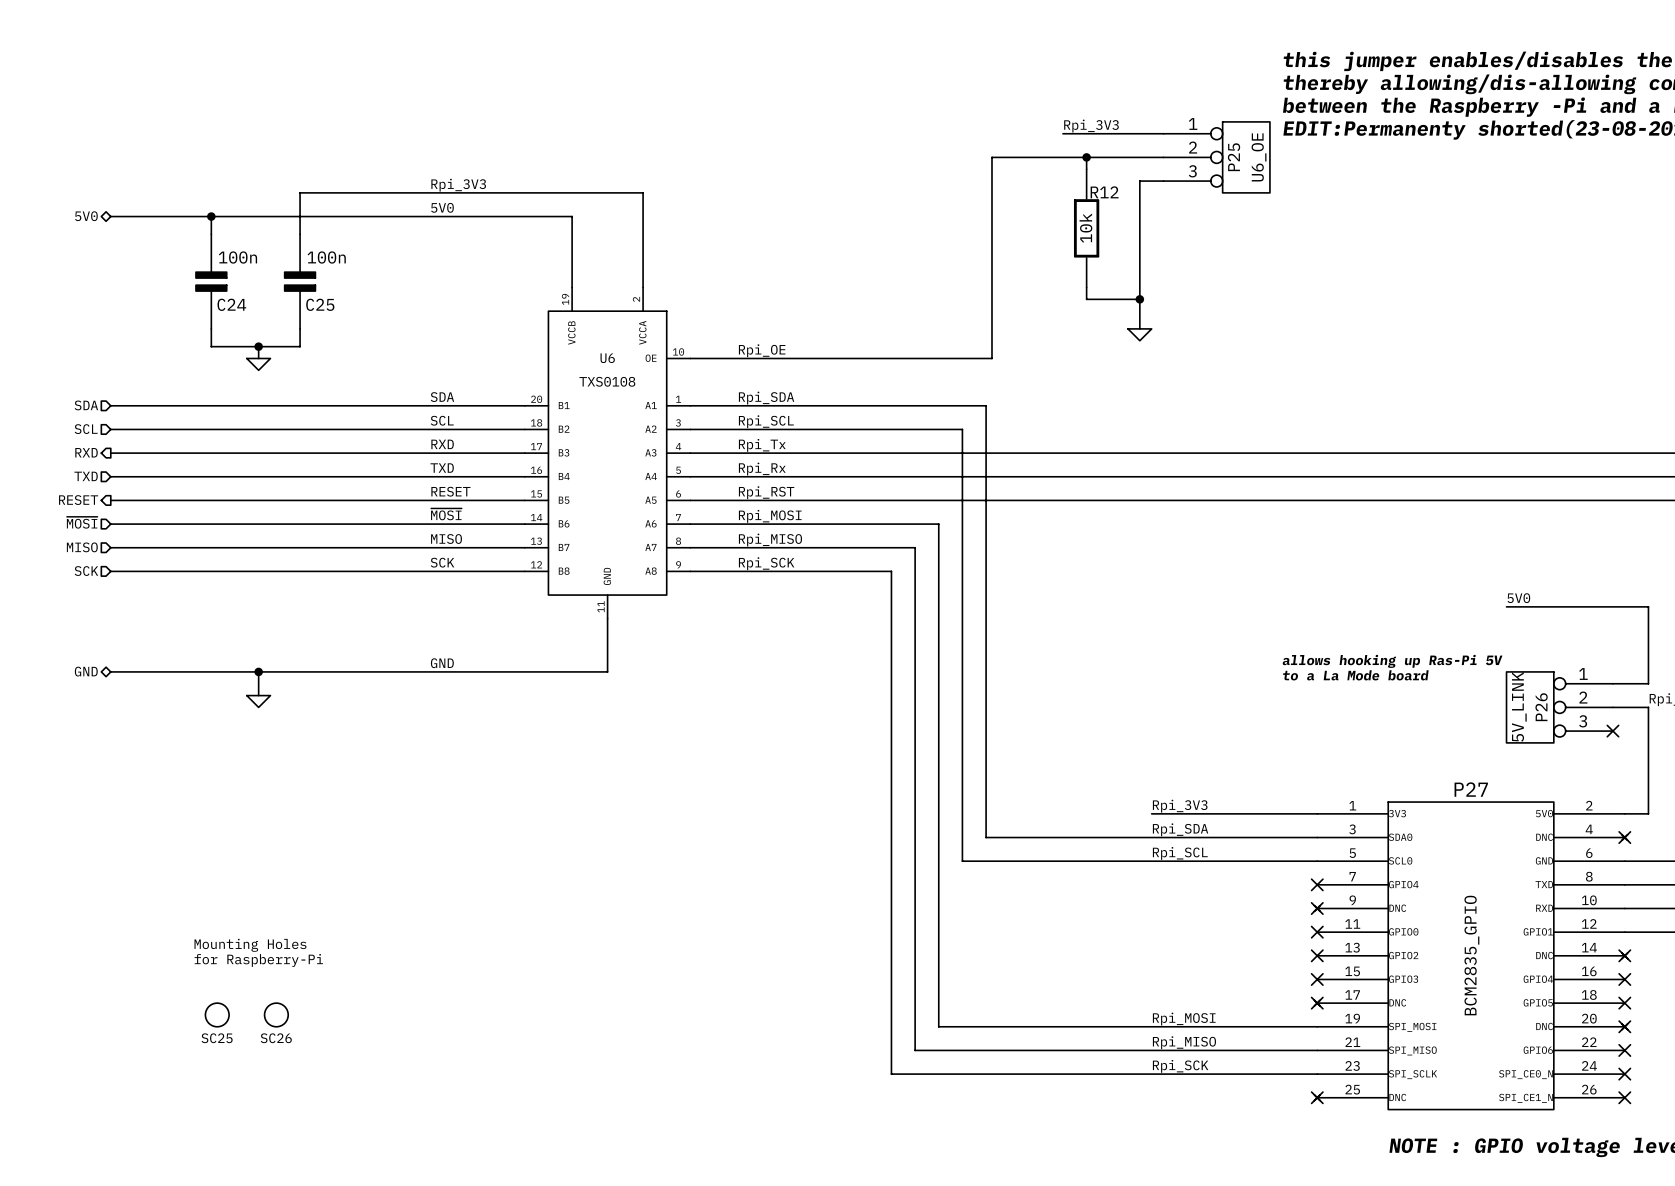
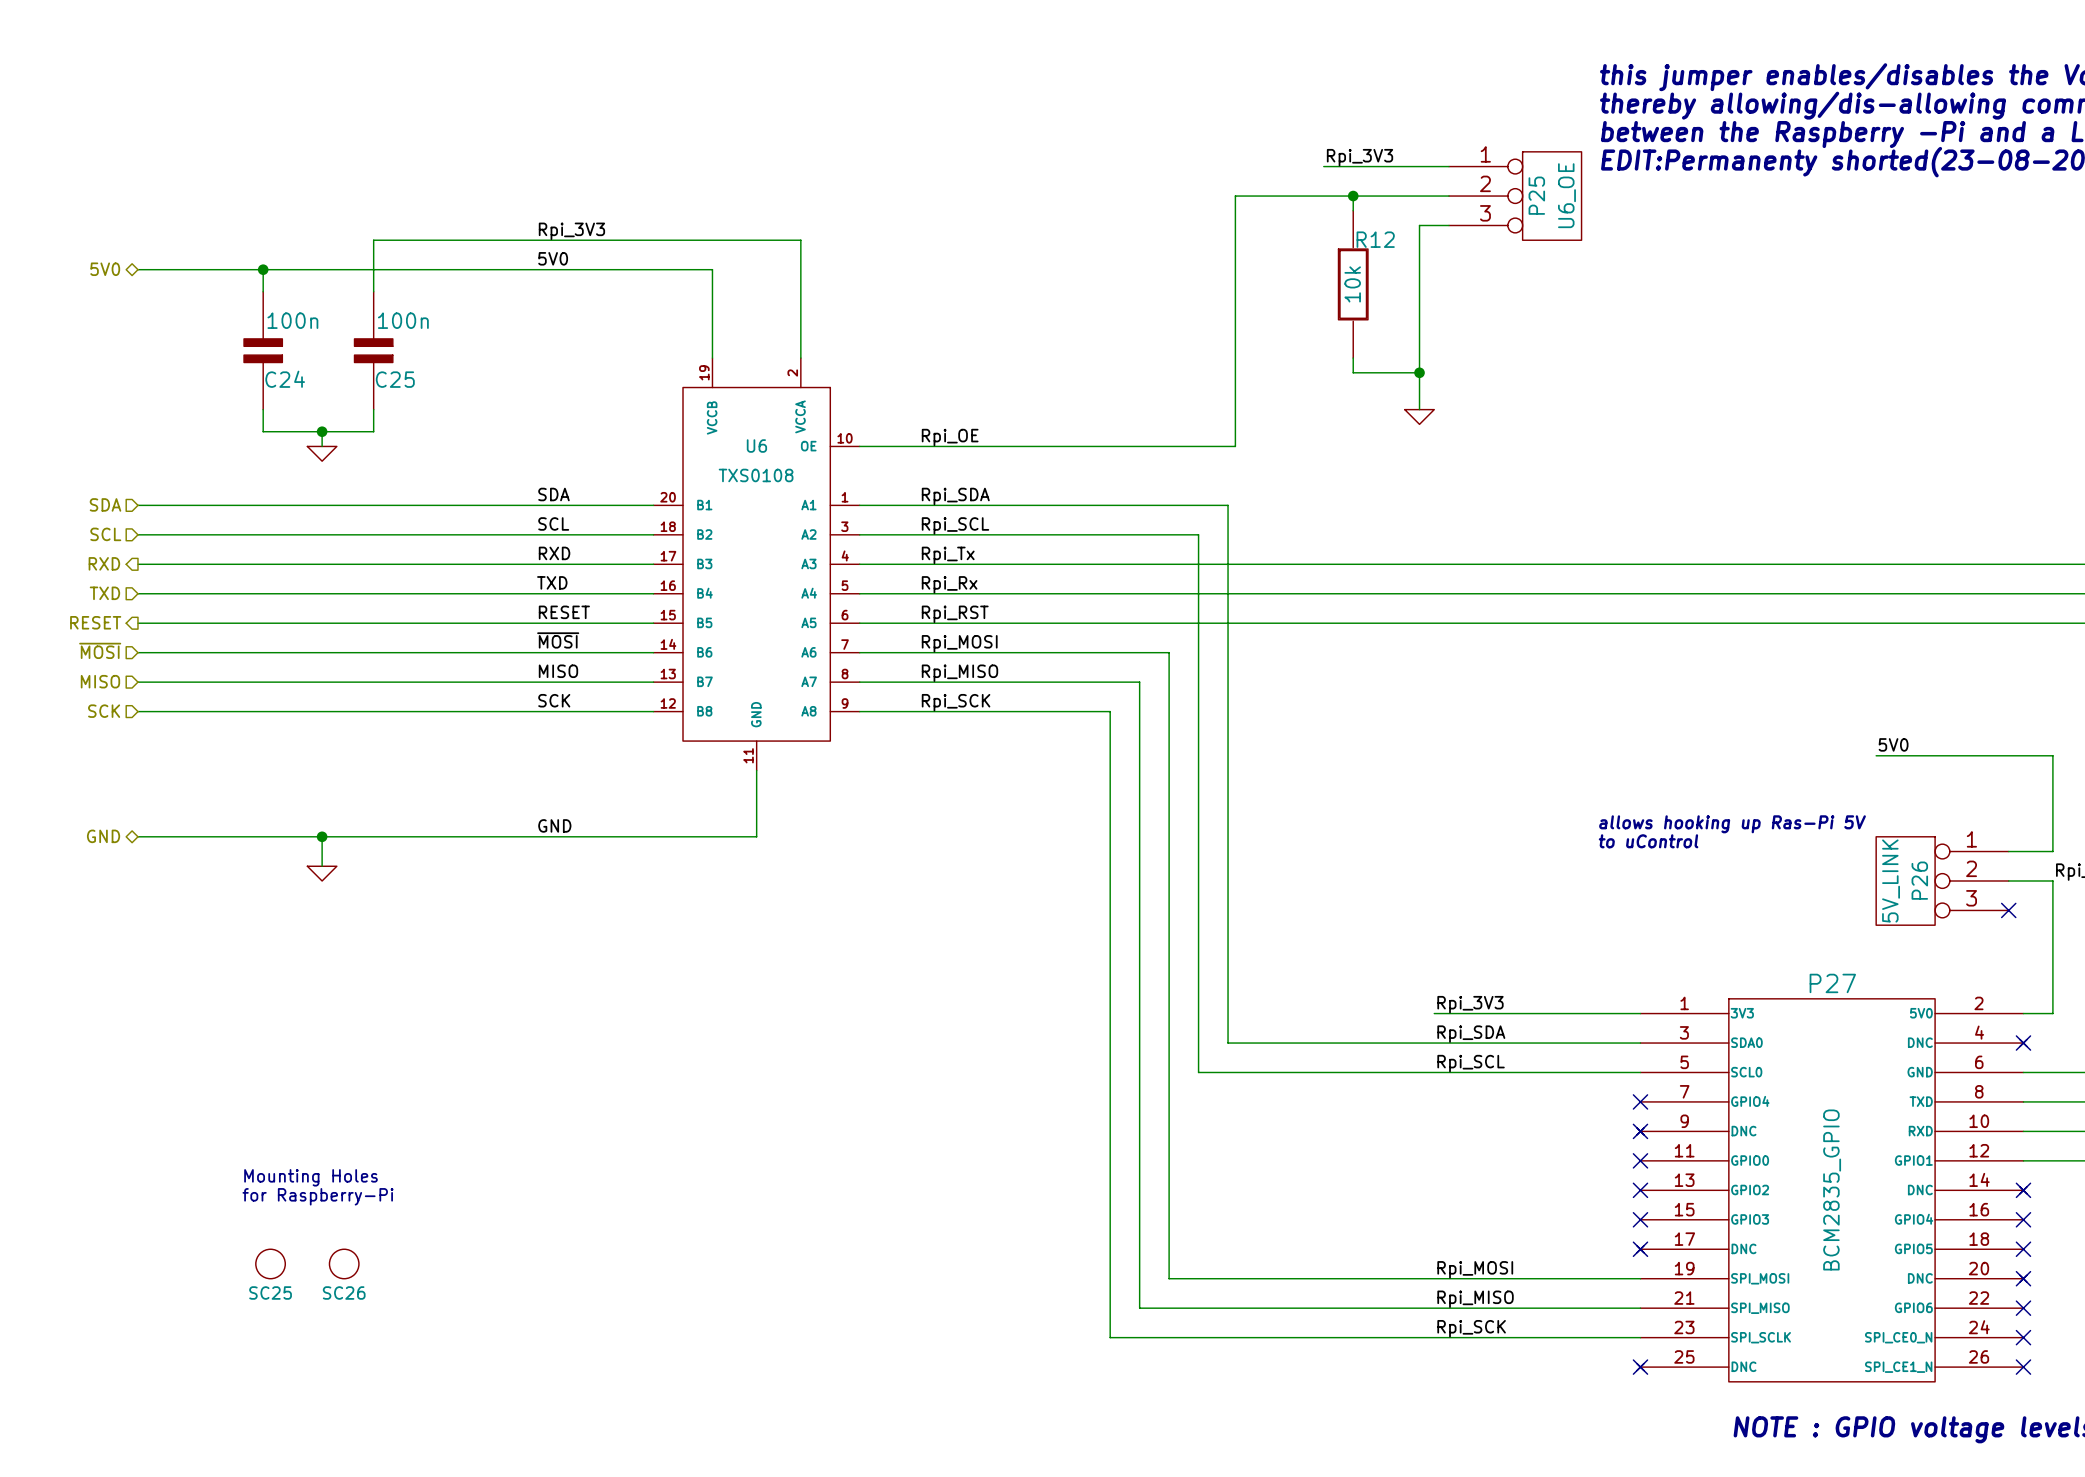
text: to a La Mode board (1355, 675) -> to uControl (1648, 841)

